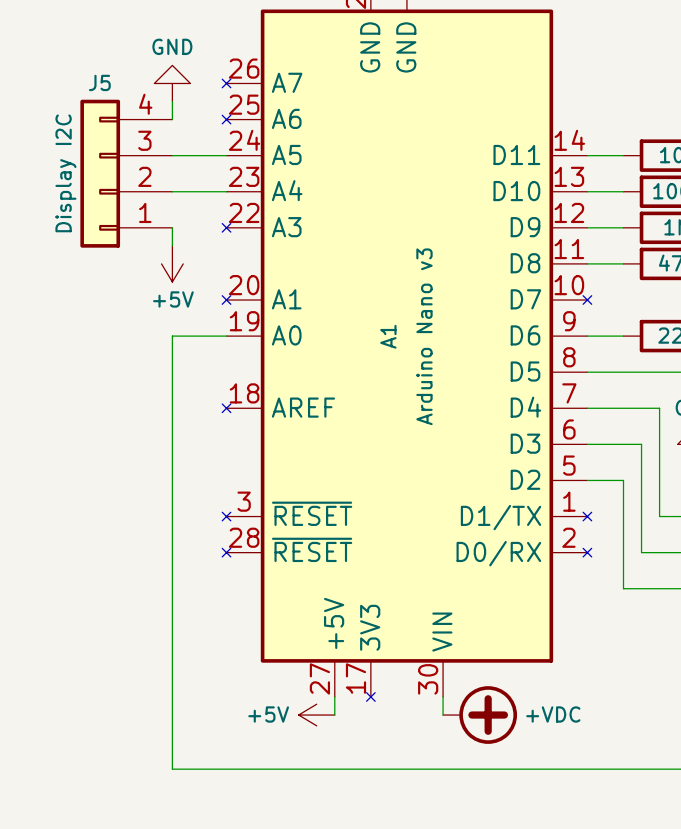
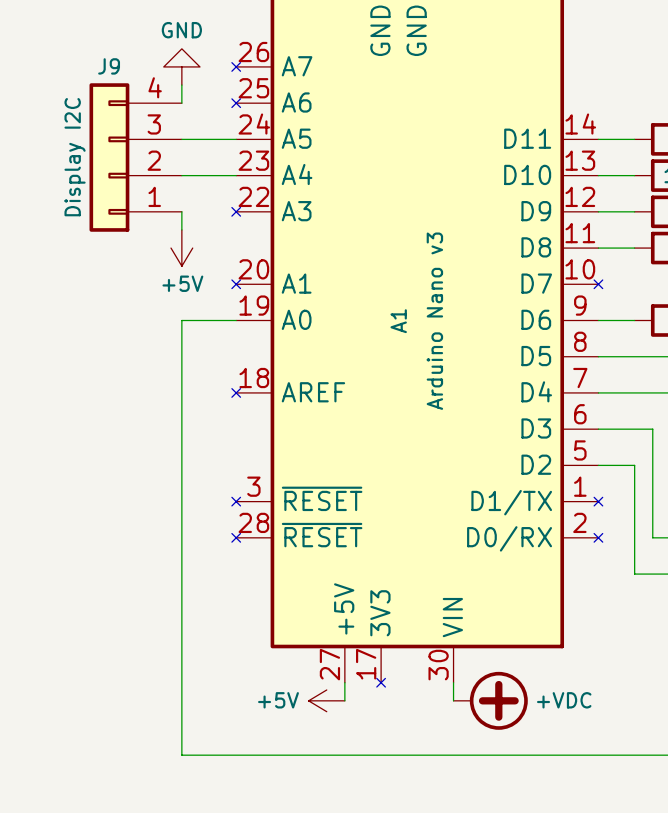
J5 name: J5 (99, 82) -> J9 (109, 66)

